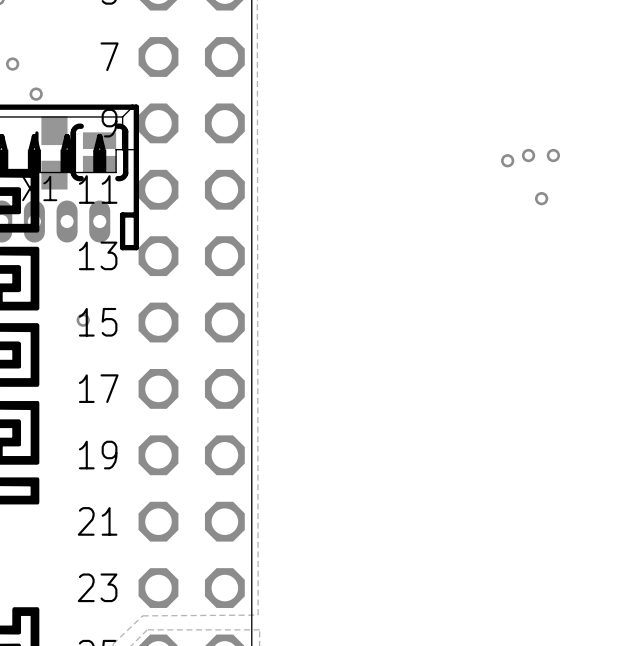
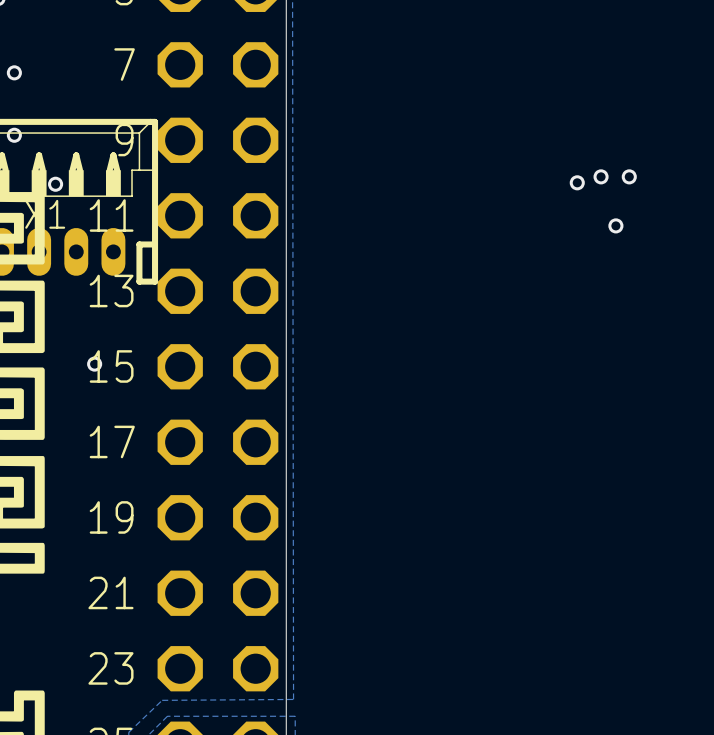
via: (36, 94) -> none
via: none -> (14, 135)
part: (54, 152) -> none
part: (99, 152) -> none
via: none -> (55, 184)

